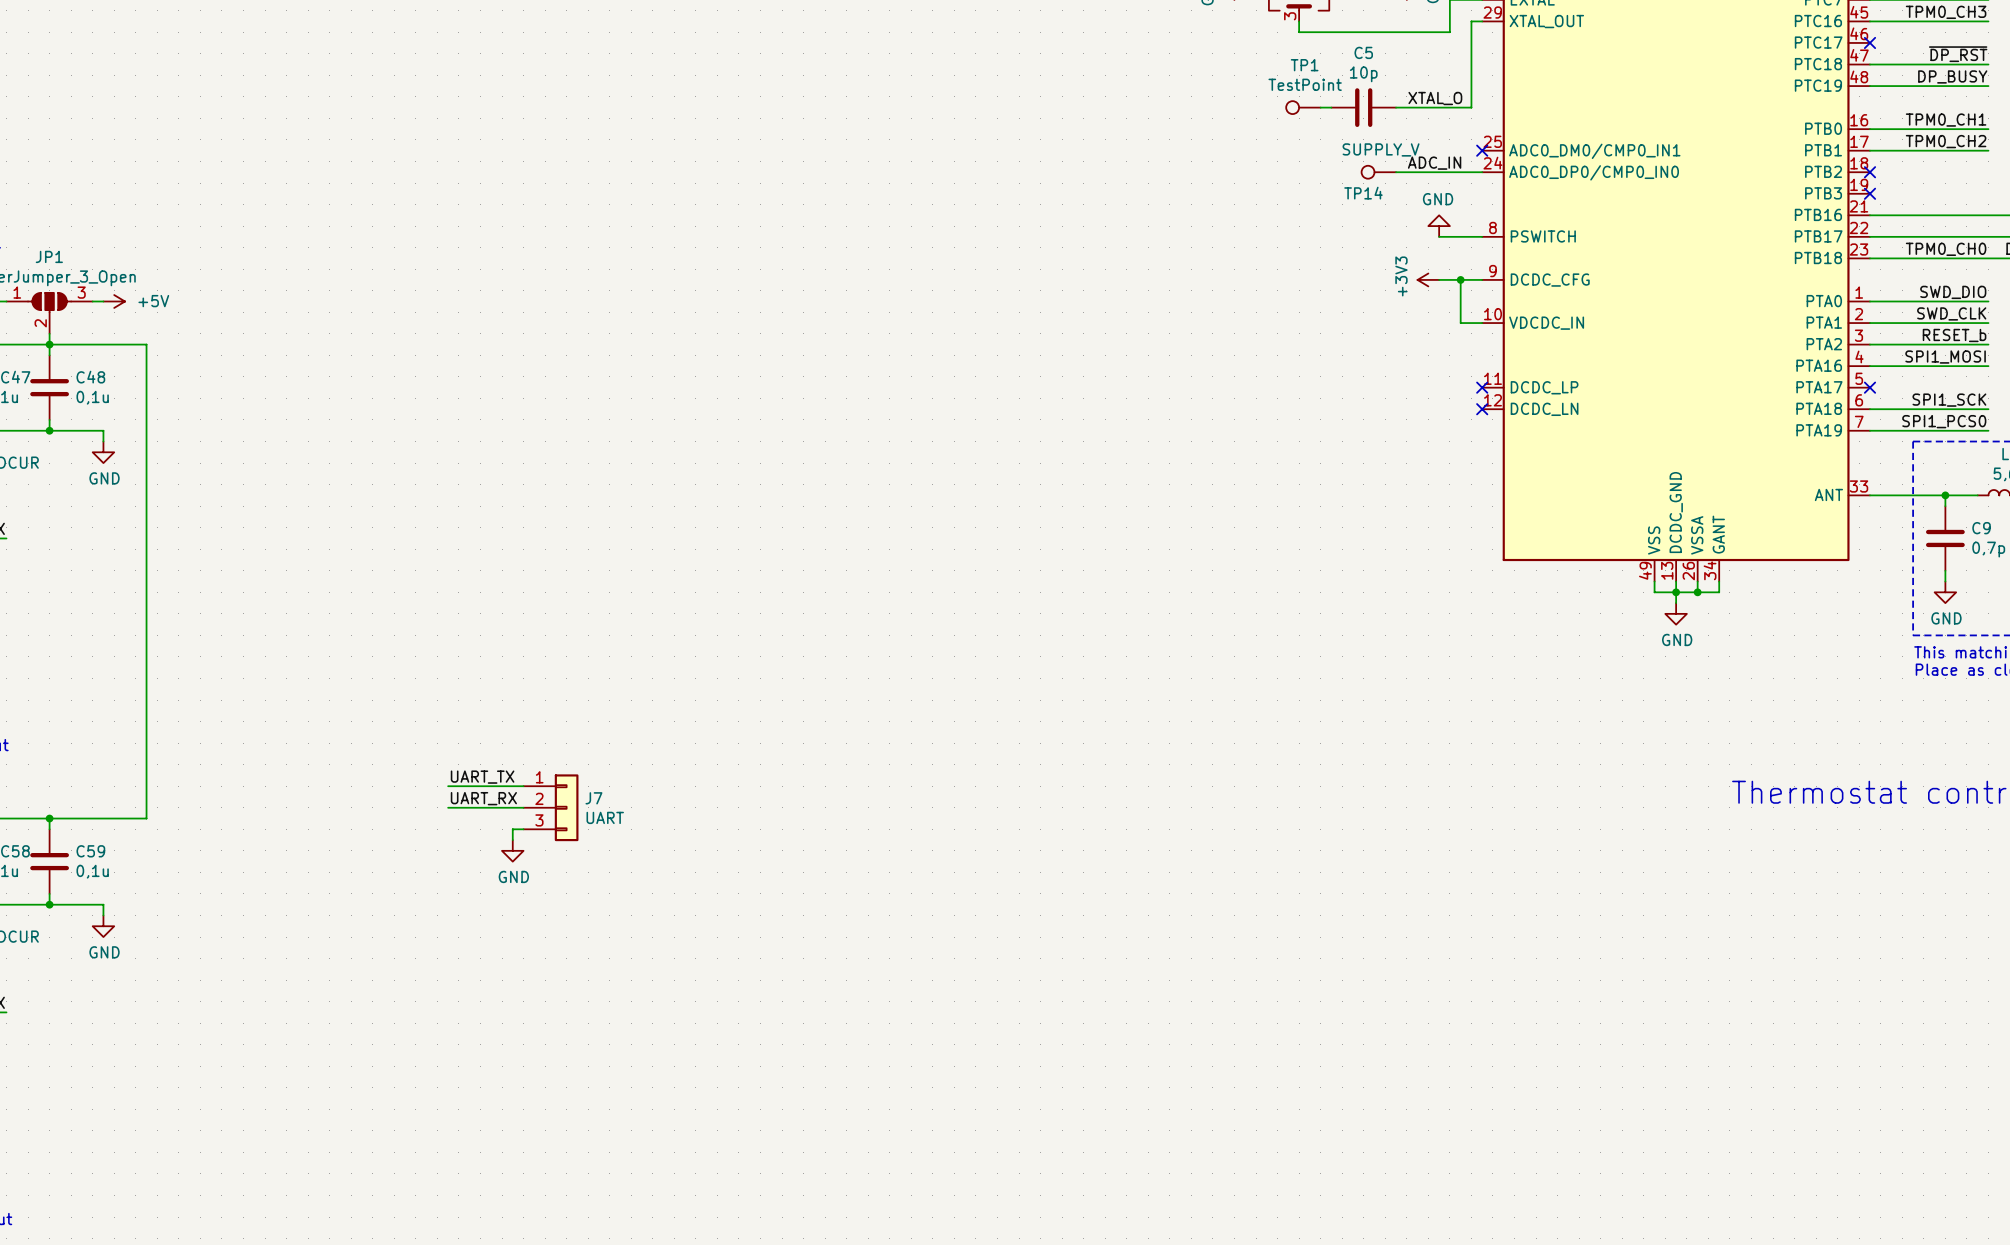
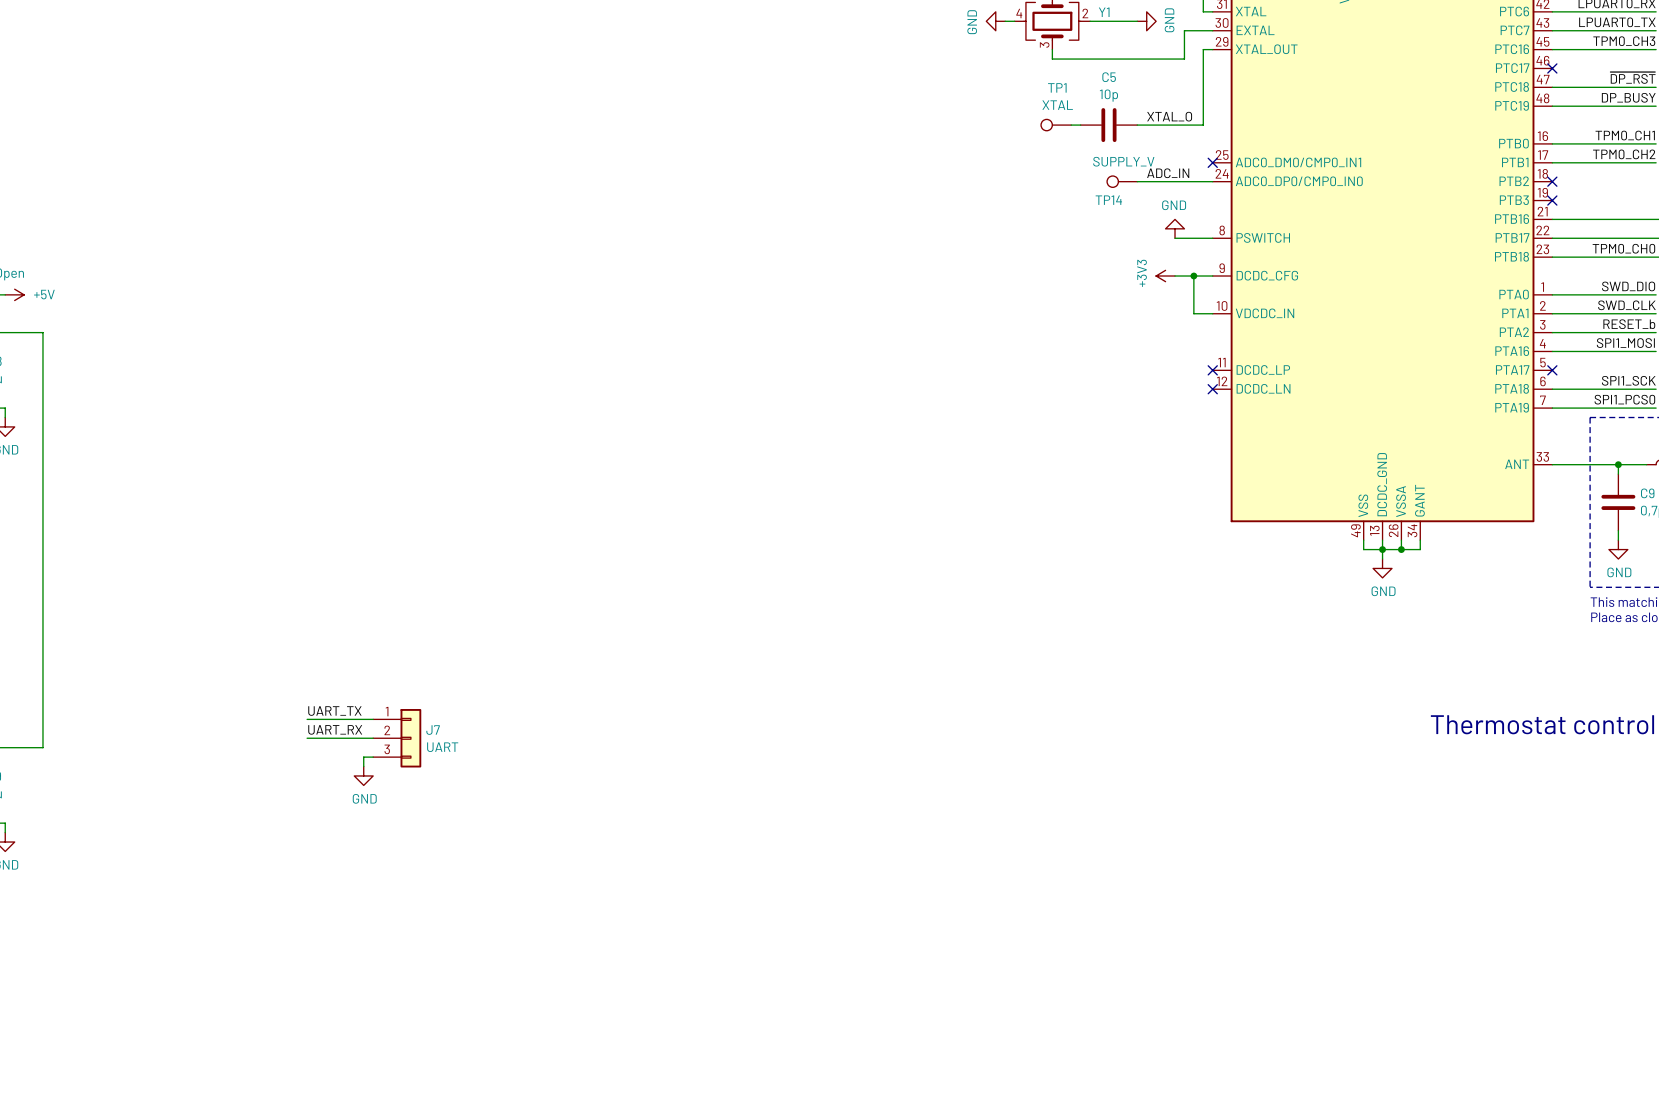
TP1 value: TestPoint (1305, 84) -> XTAL (1057, 105)

